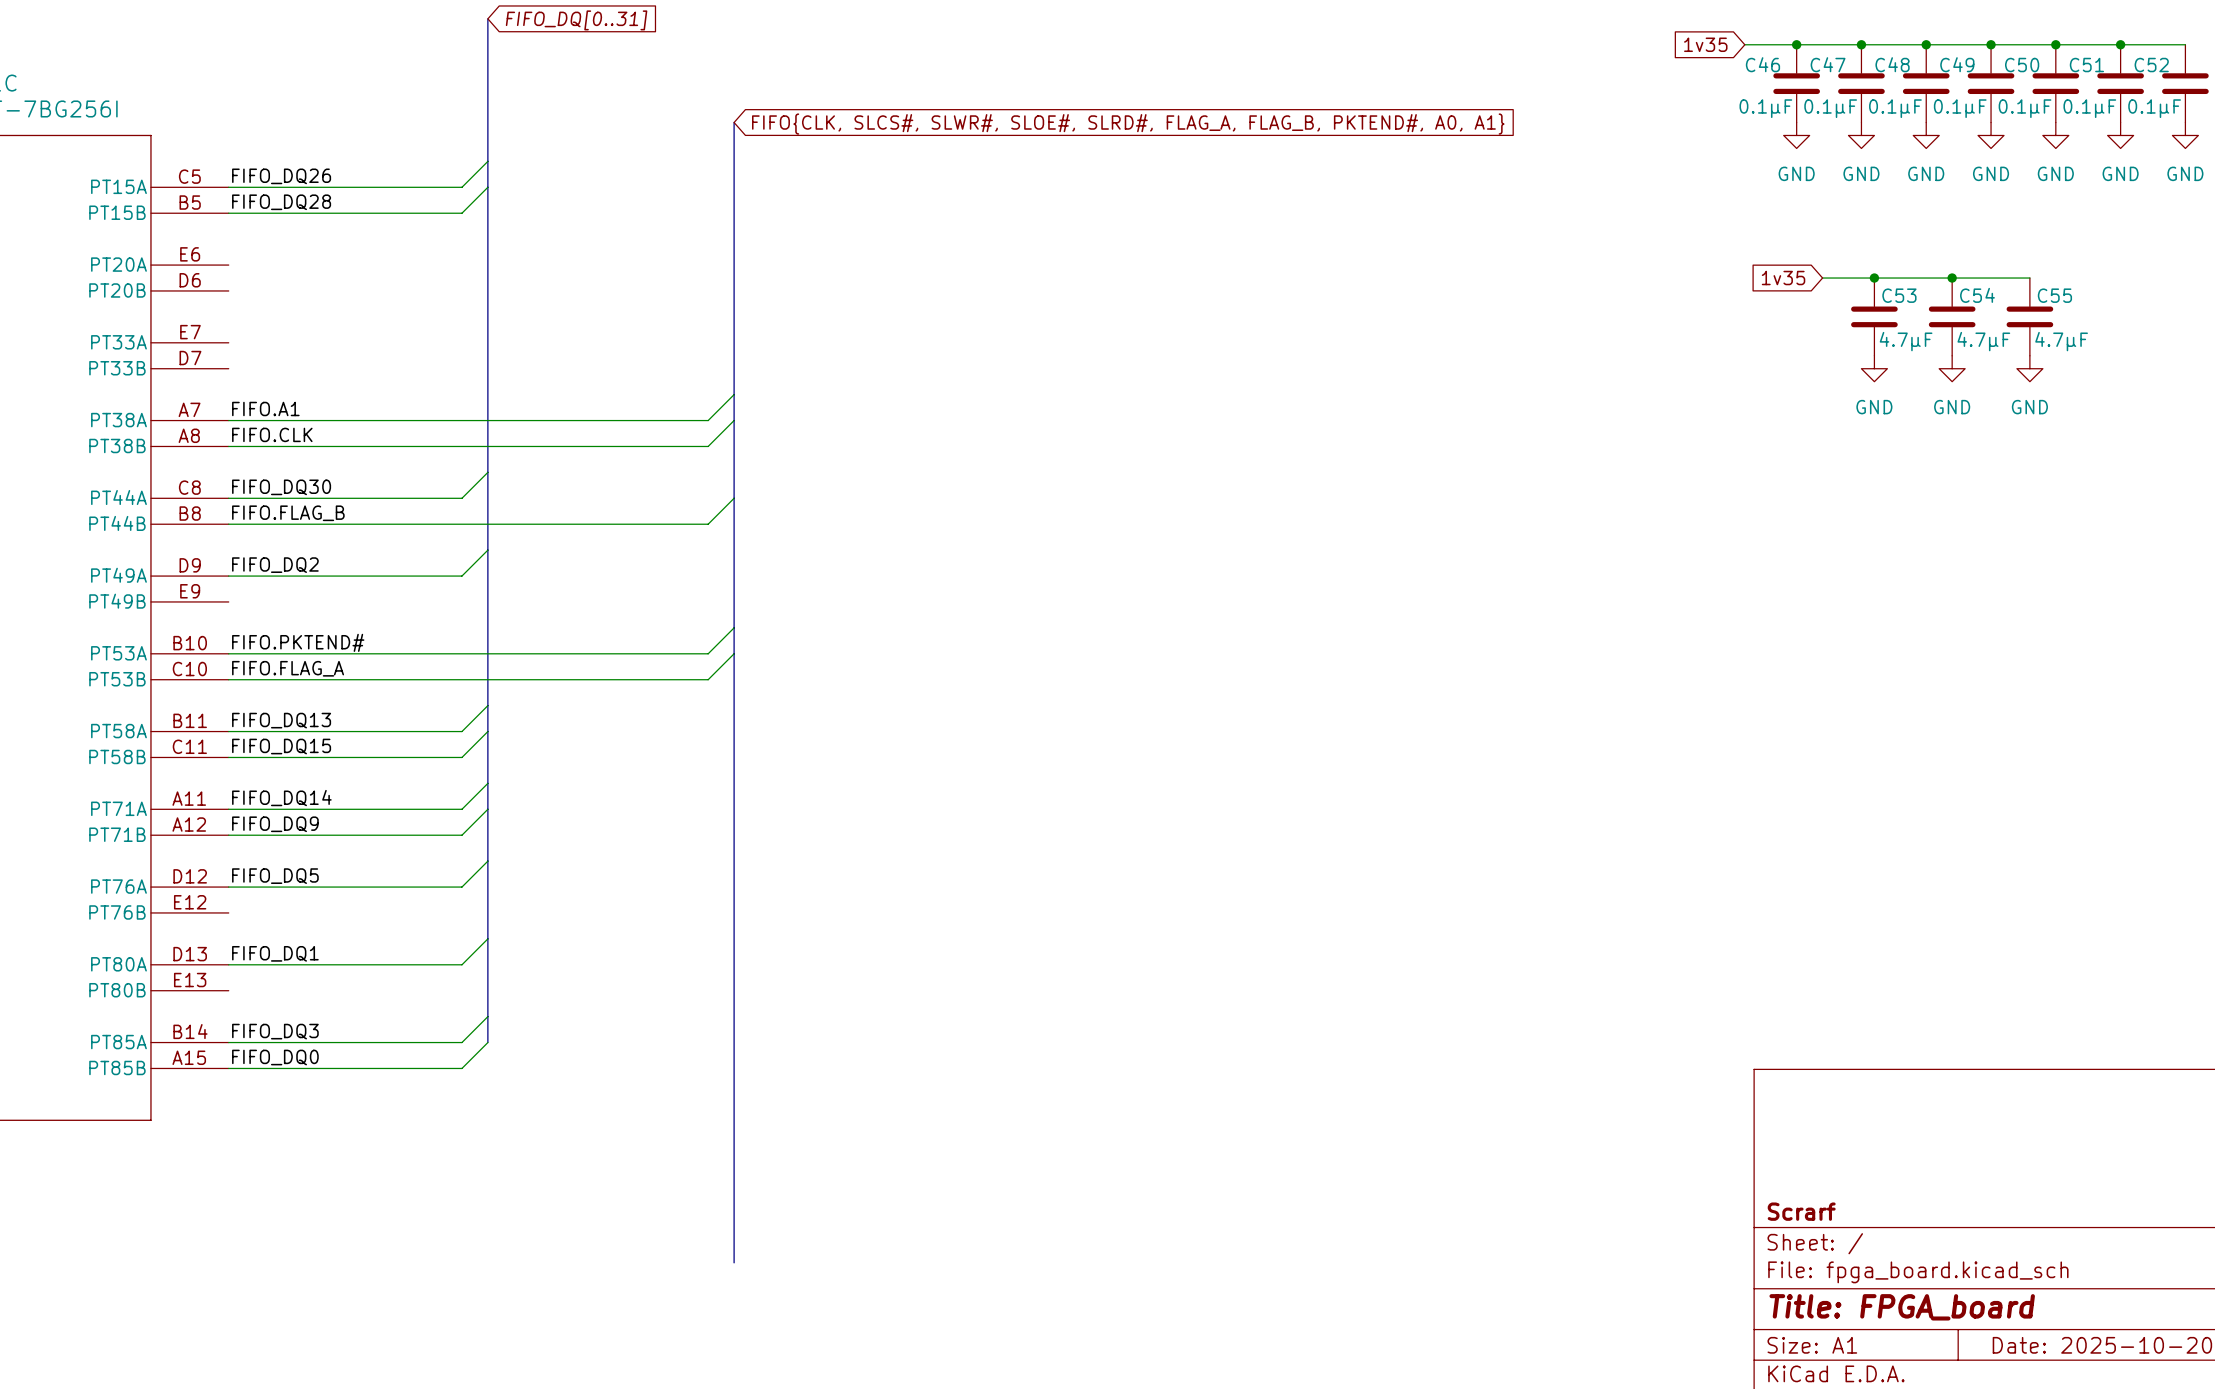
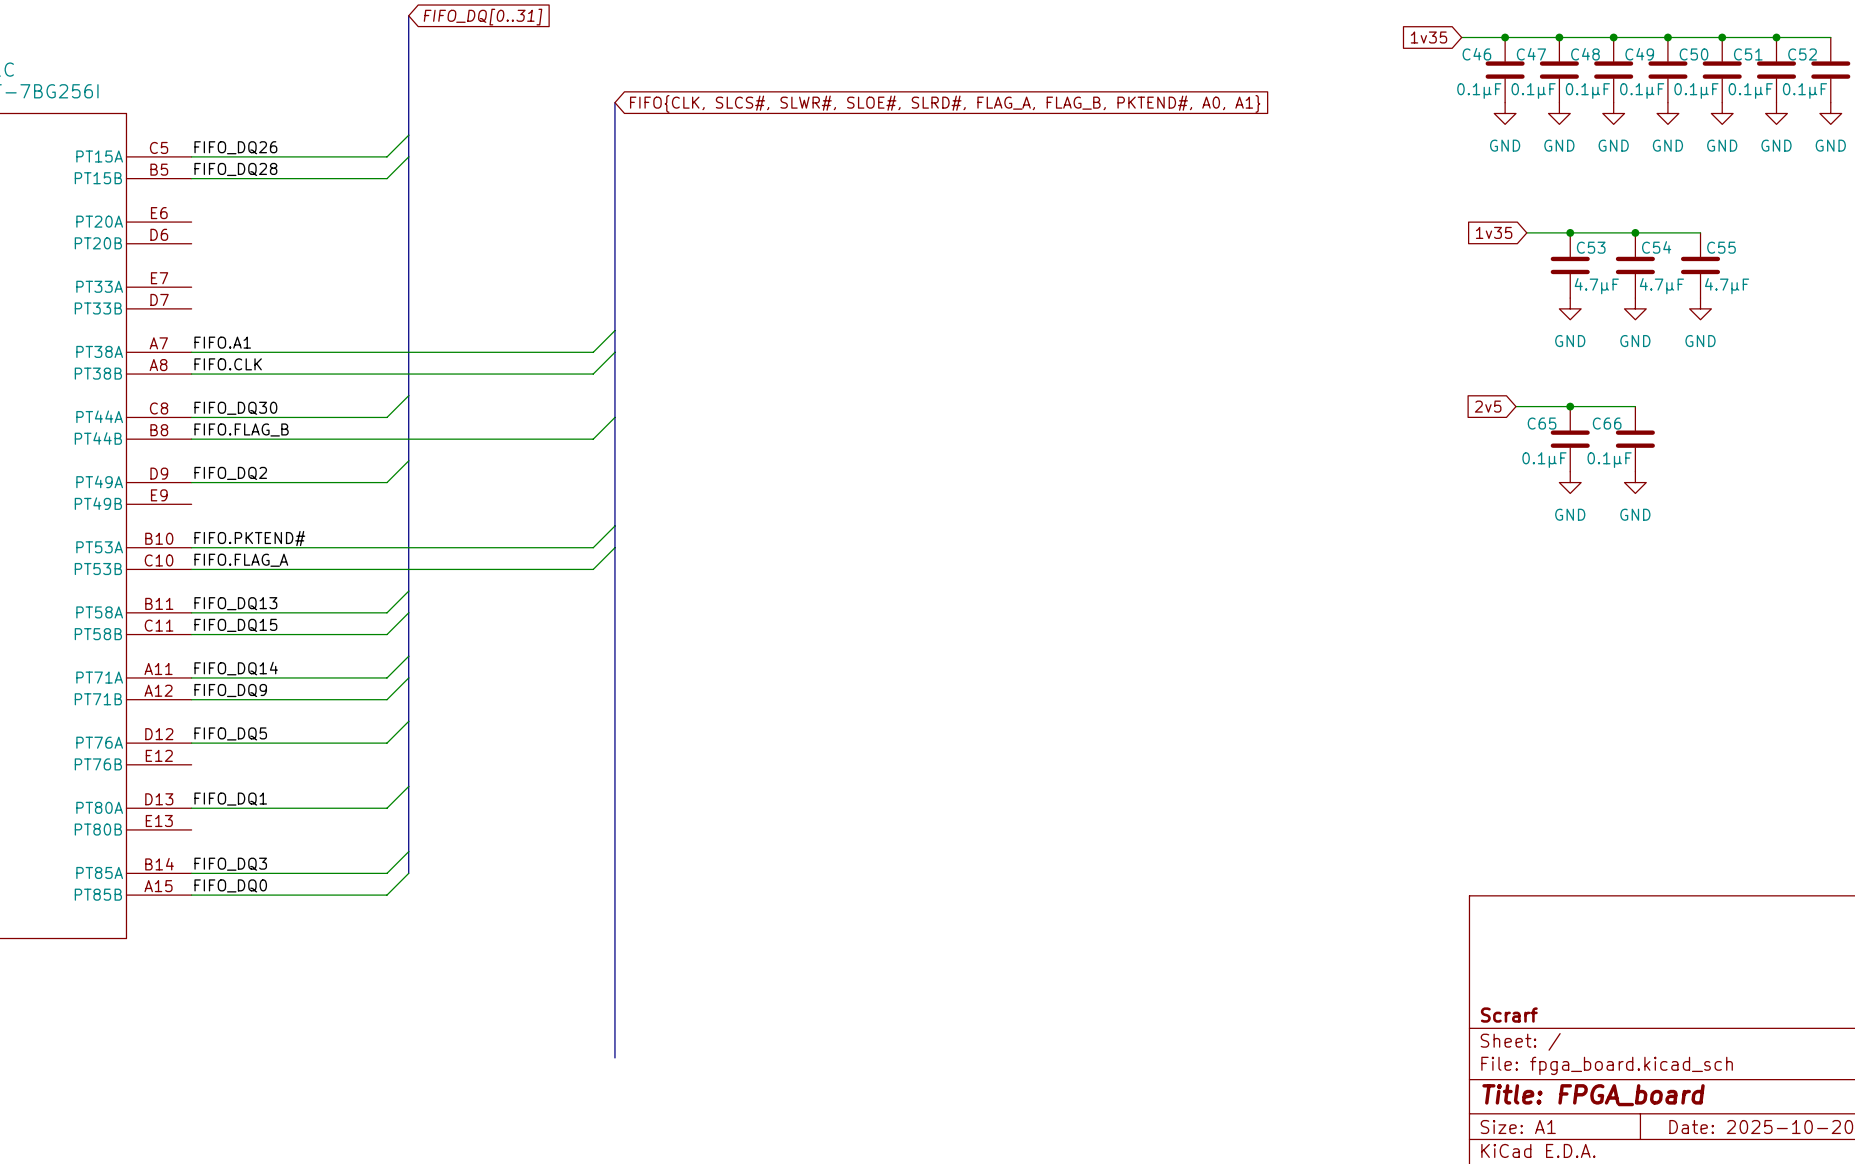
global label: none -> 2v5 (1488, 406)
wire: none -> (1515, 406) (1635, 406)
junction: none -> (1570, 406)
C65: none -> 0.1µF (1570, 439)
C66: none -> 0.1µF (1635, 439)
power symbol: none -> GND (1570, 482)
power symbol: none -> GND (1635, 482)

